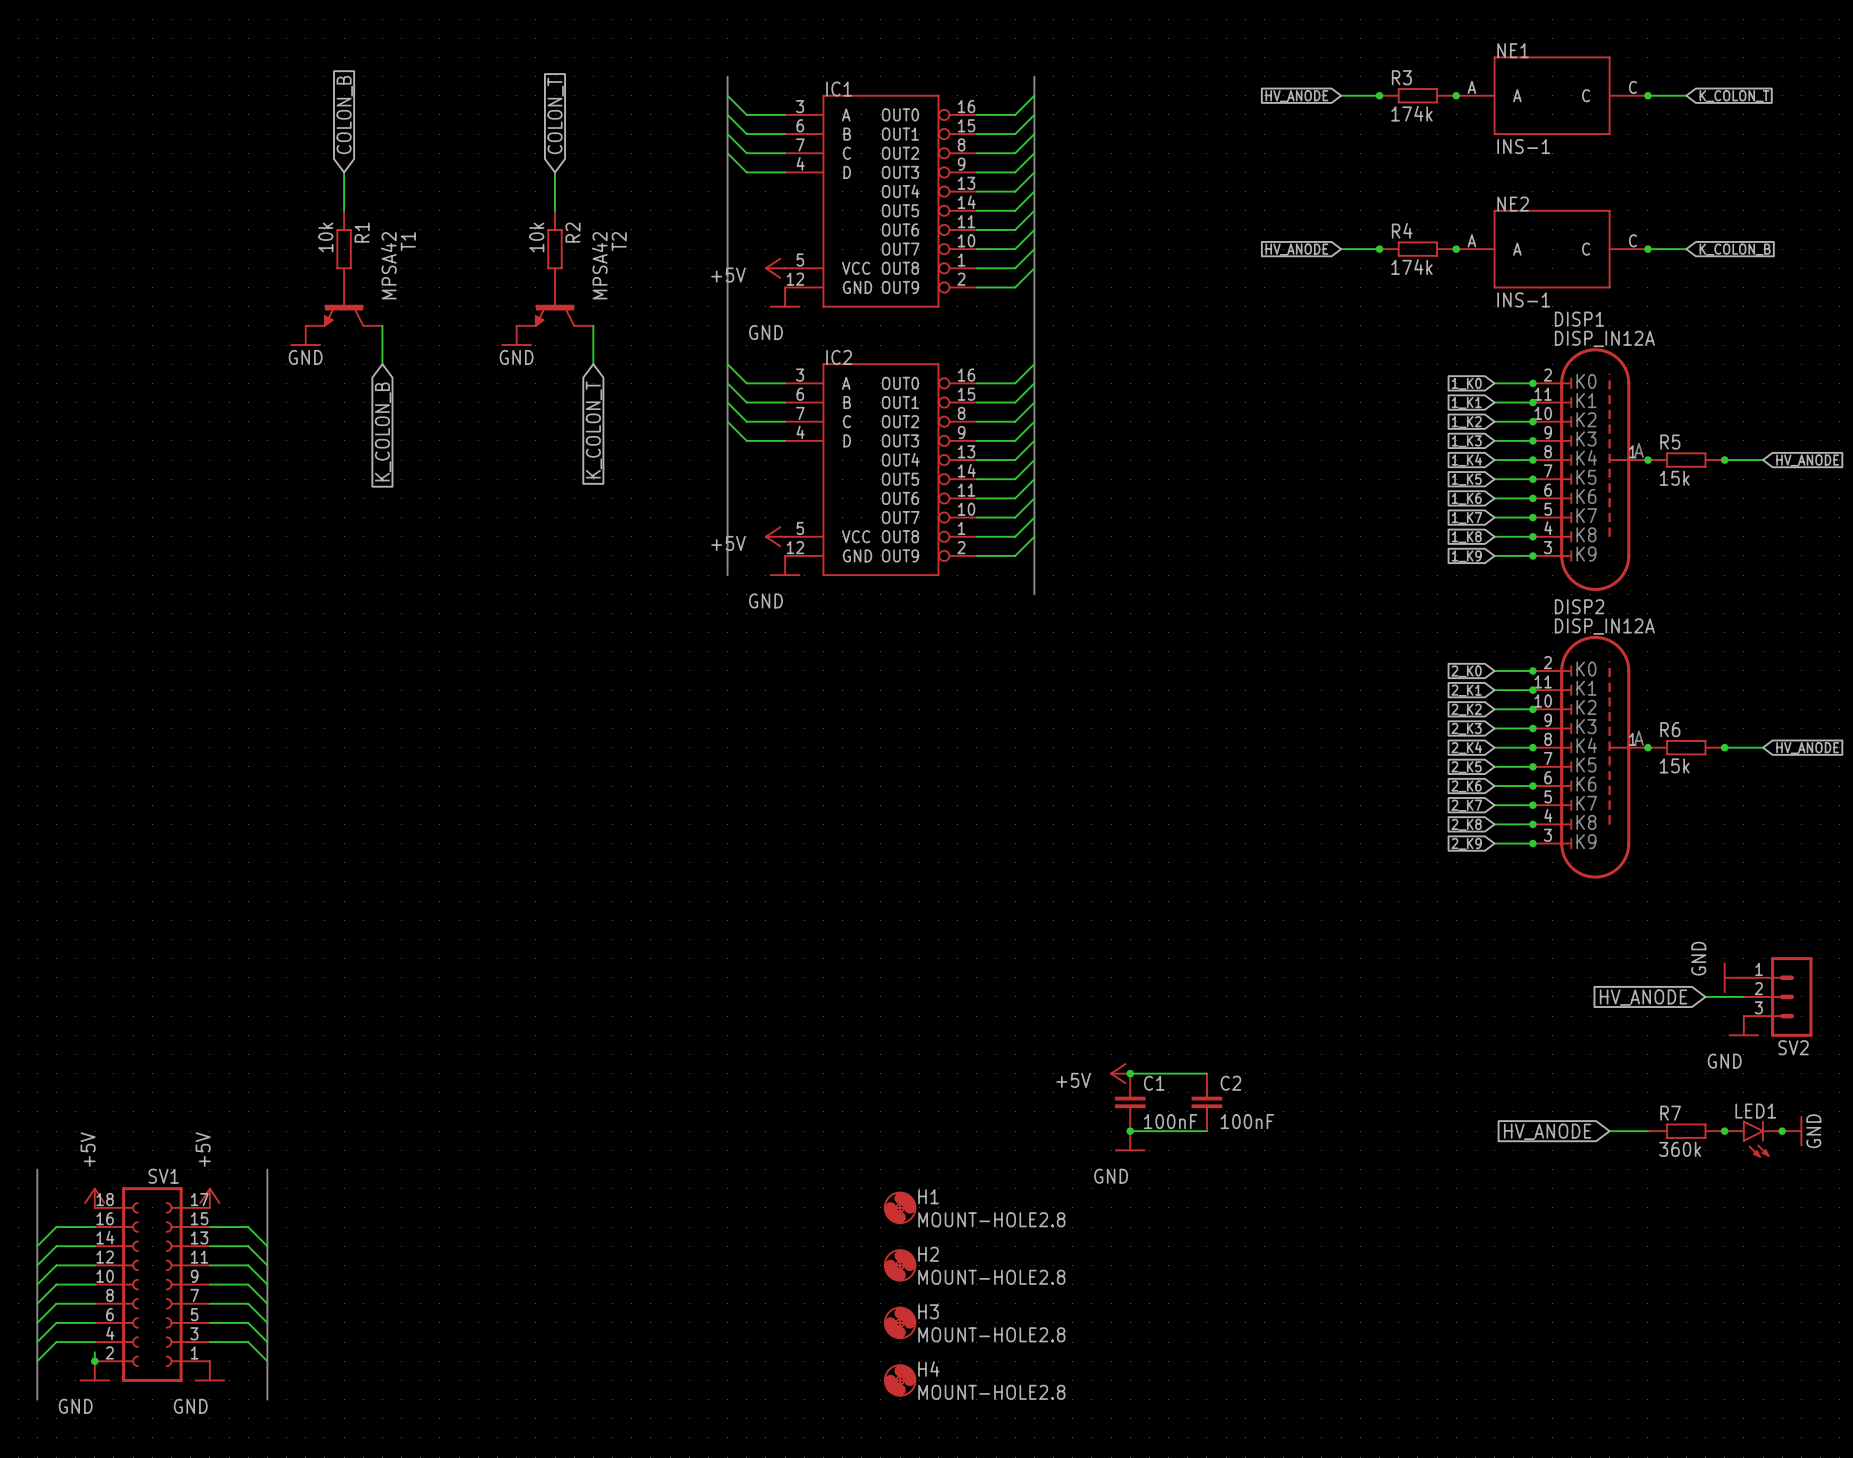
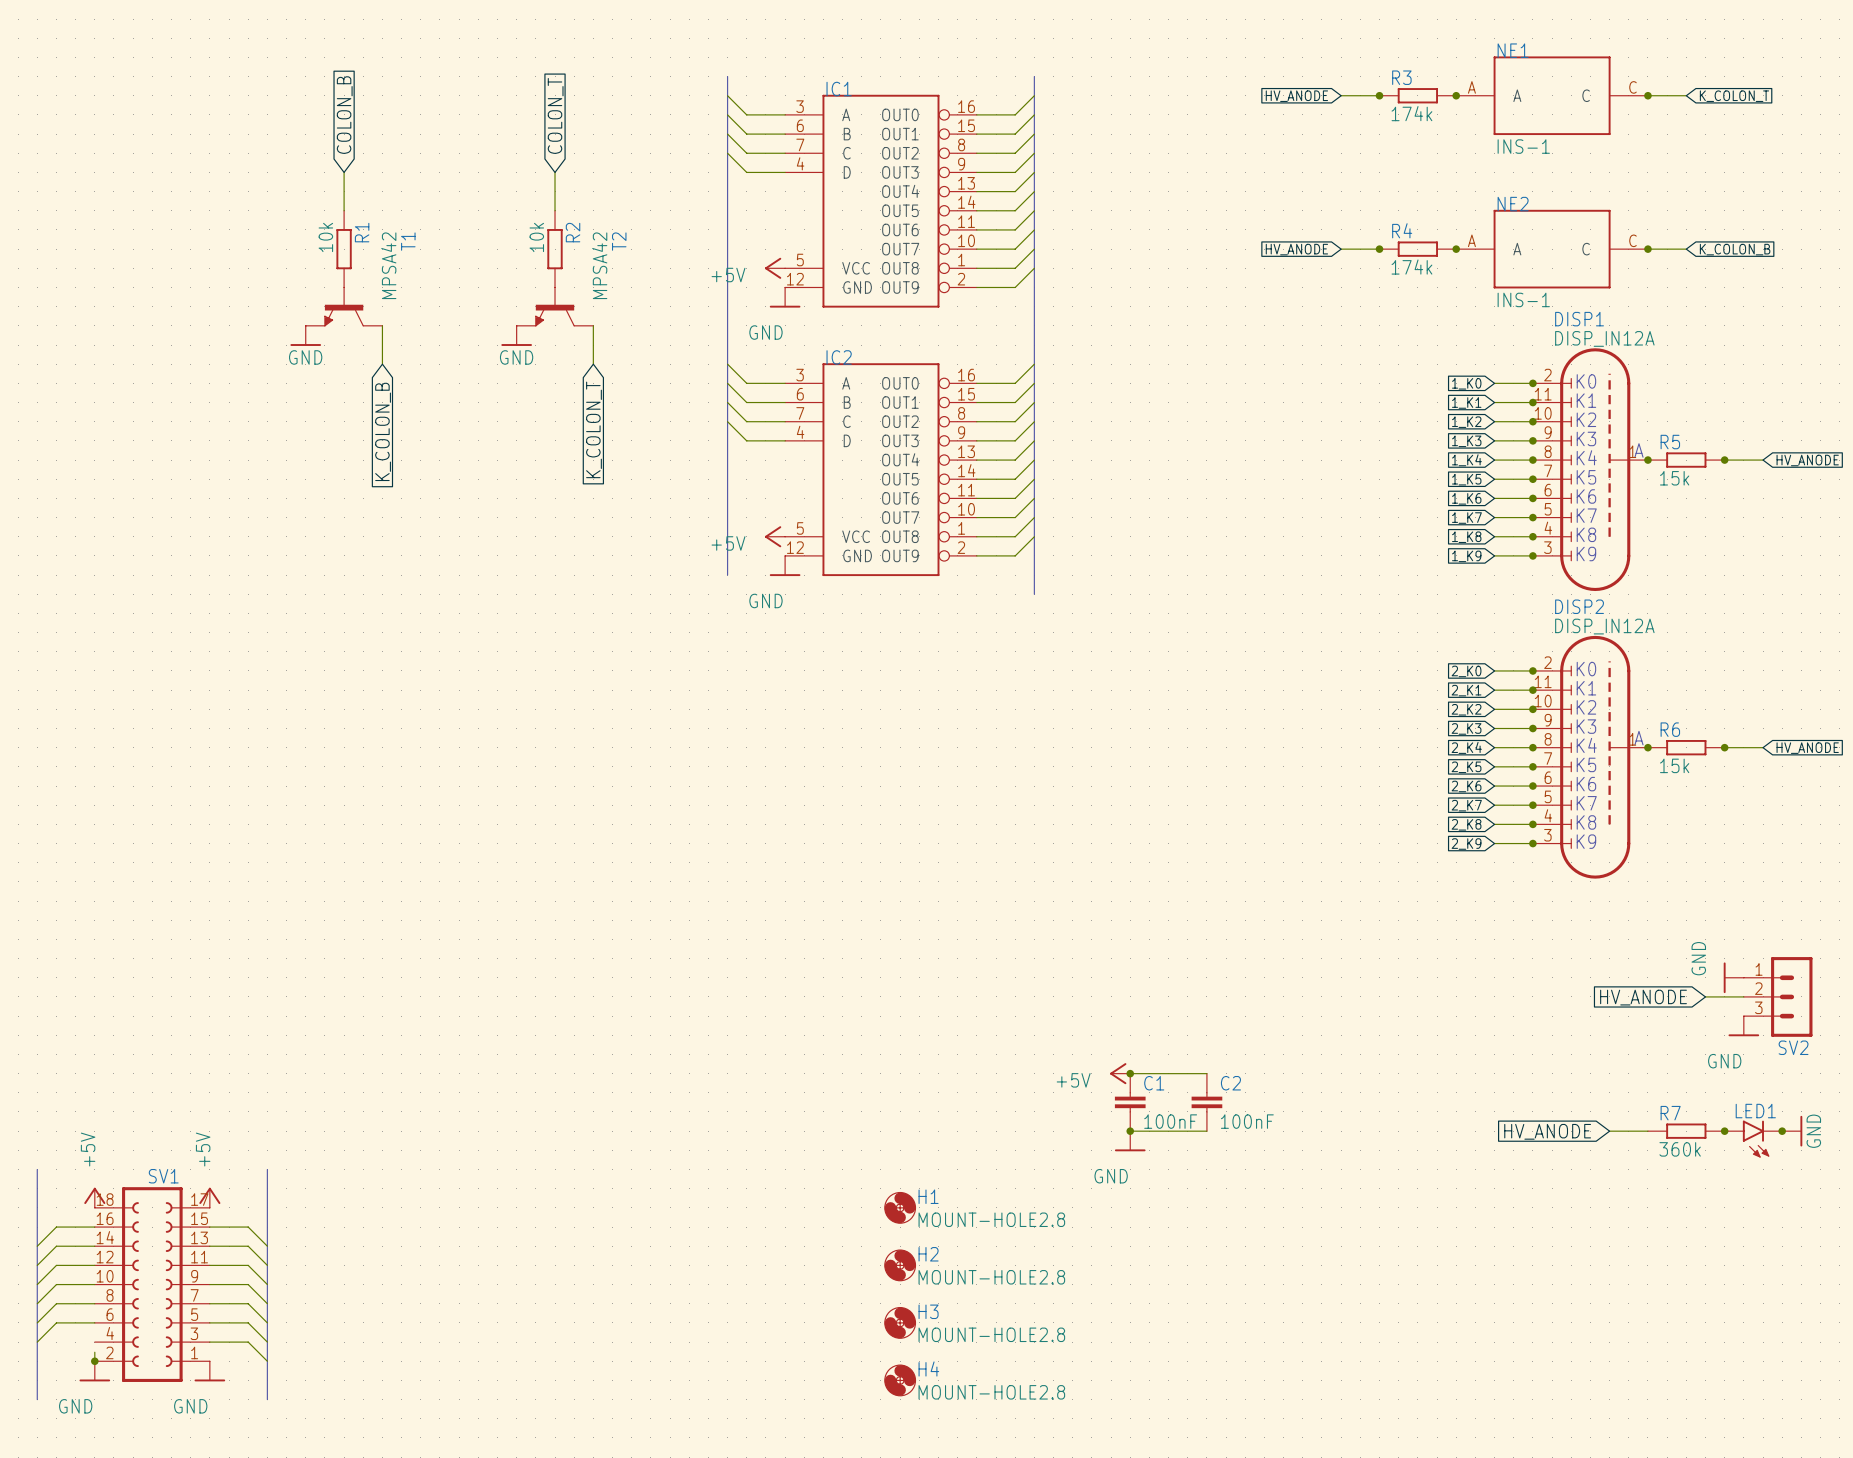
wire: (94, 1342) (56, 1342) (37, 1361) -> none

